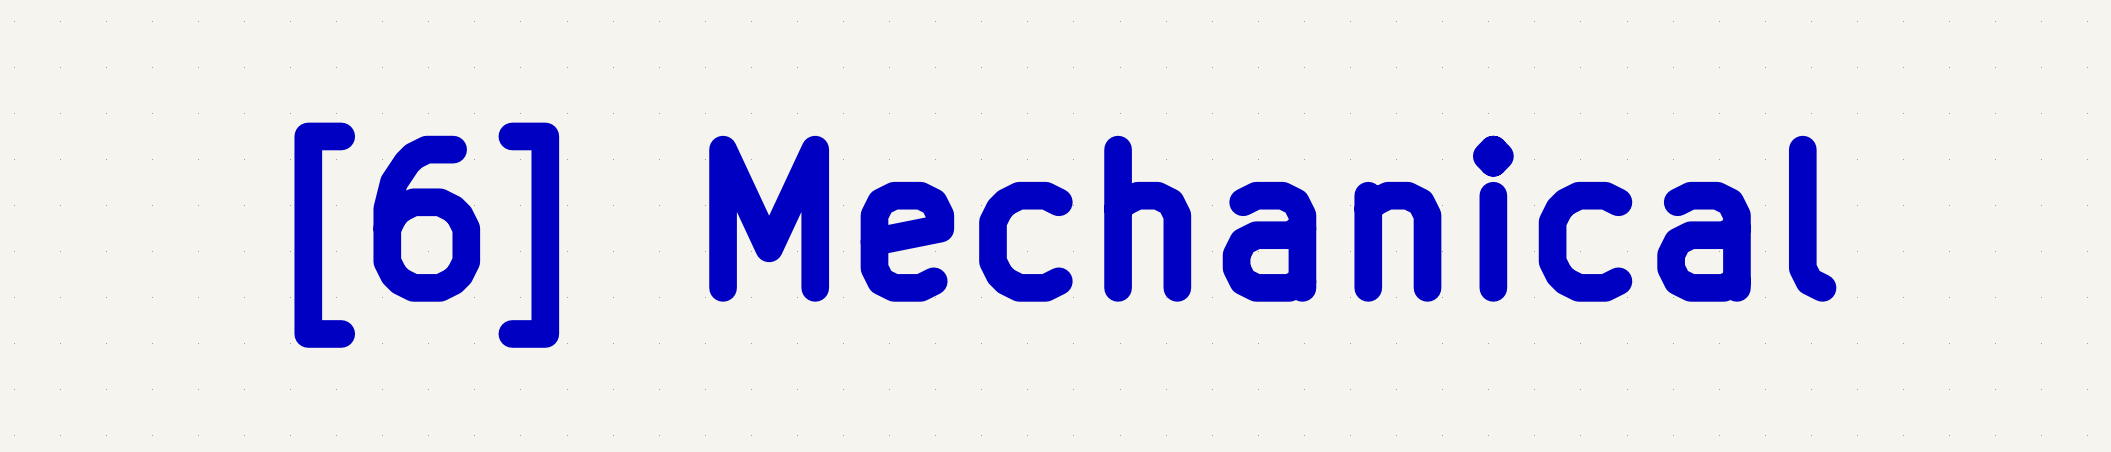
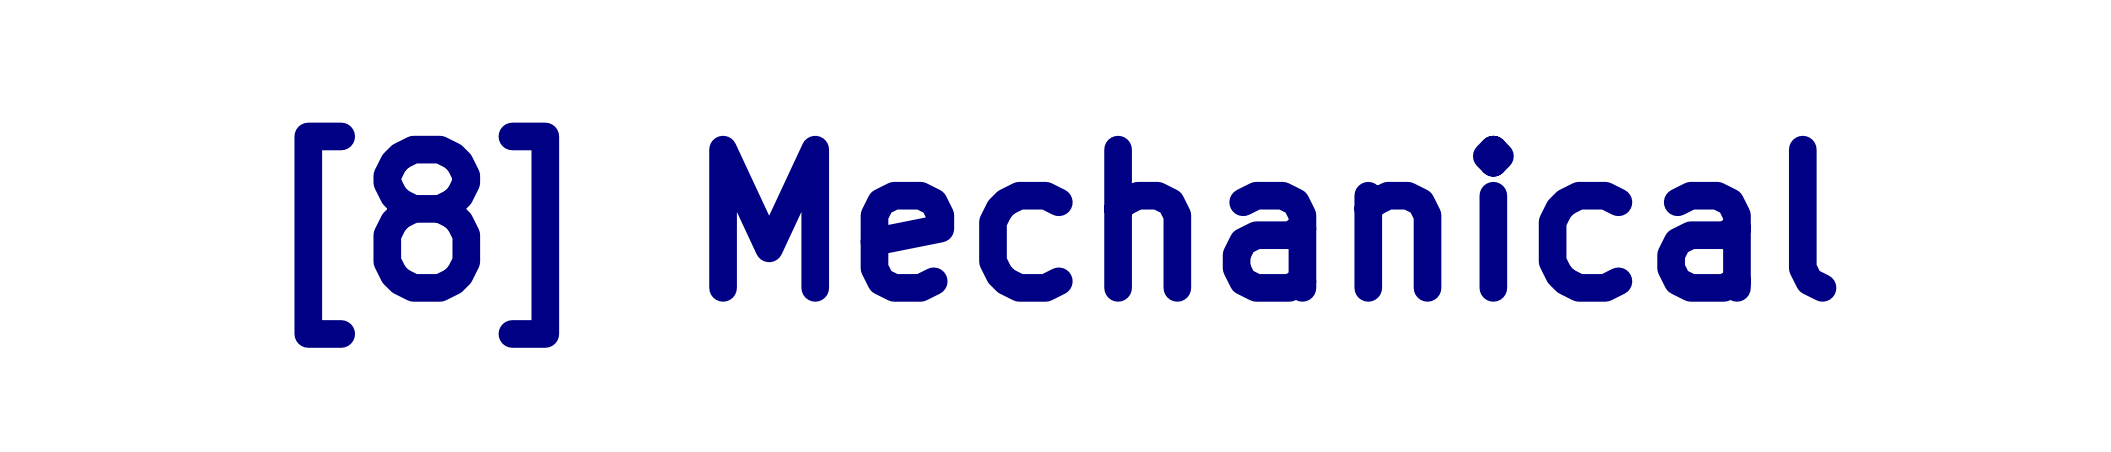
text: [6] Mechanical (1065, 235) -> [8] Mechanical (1065, 235)

